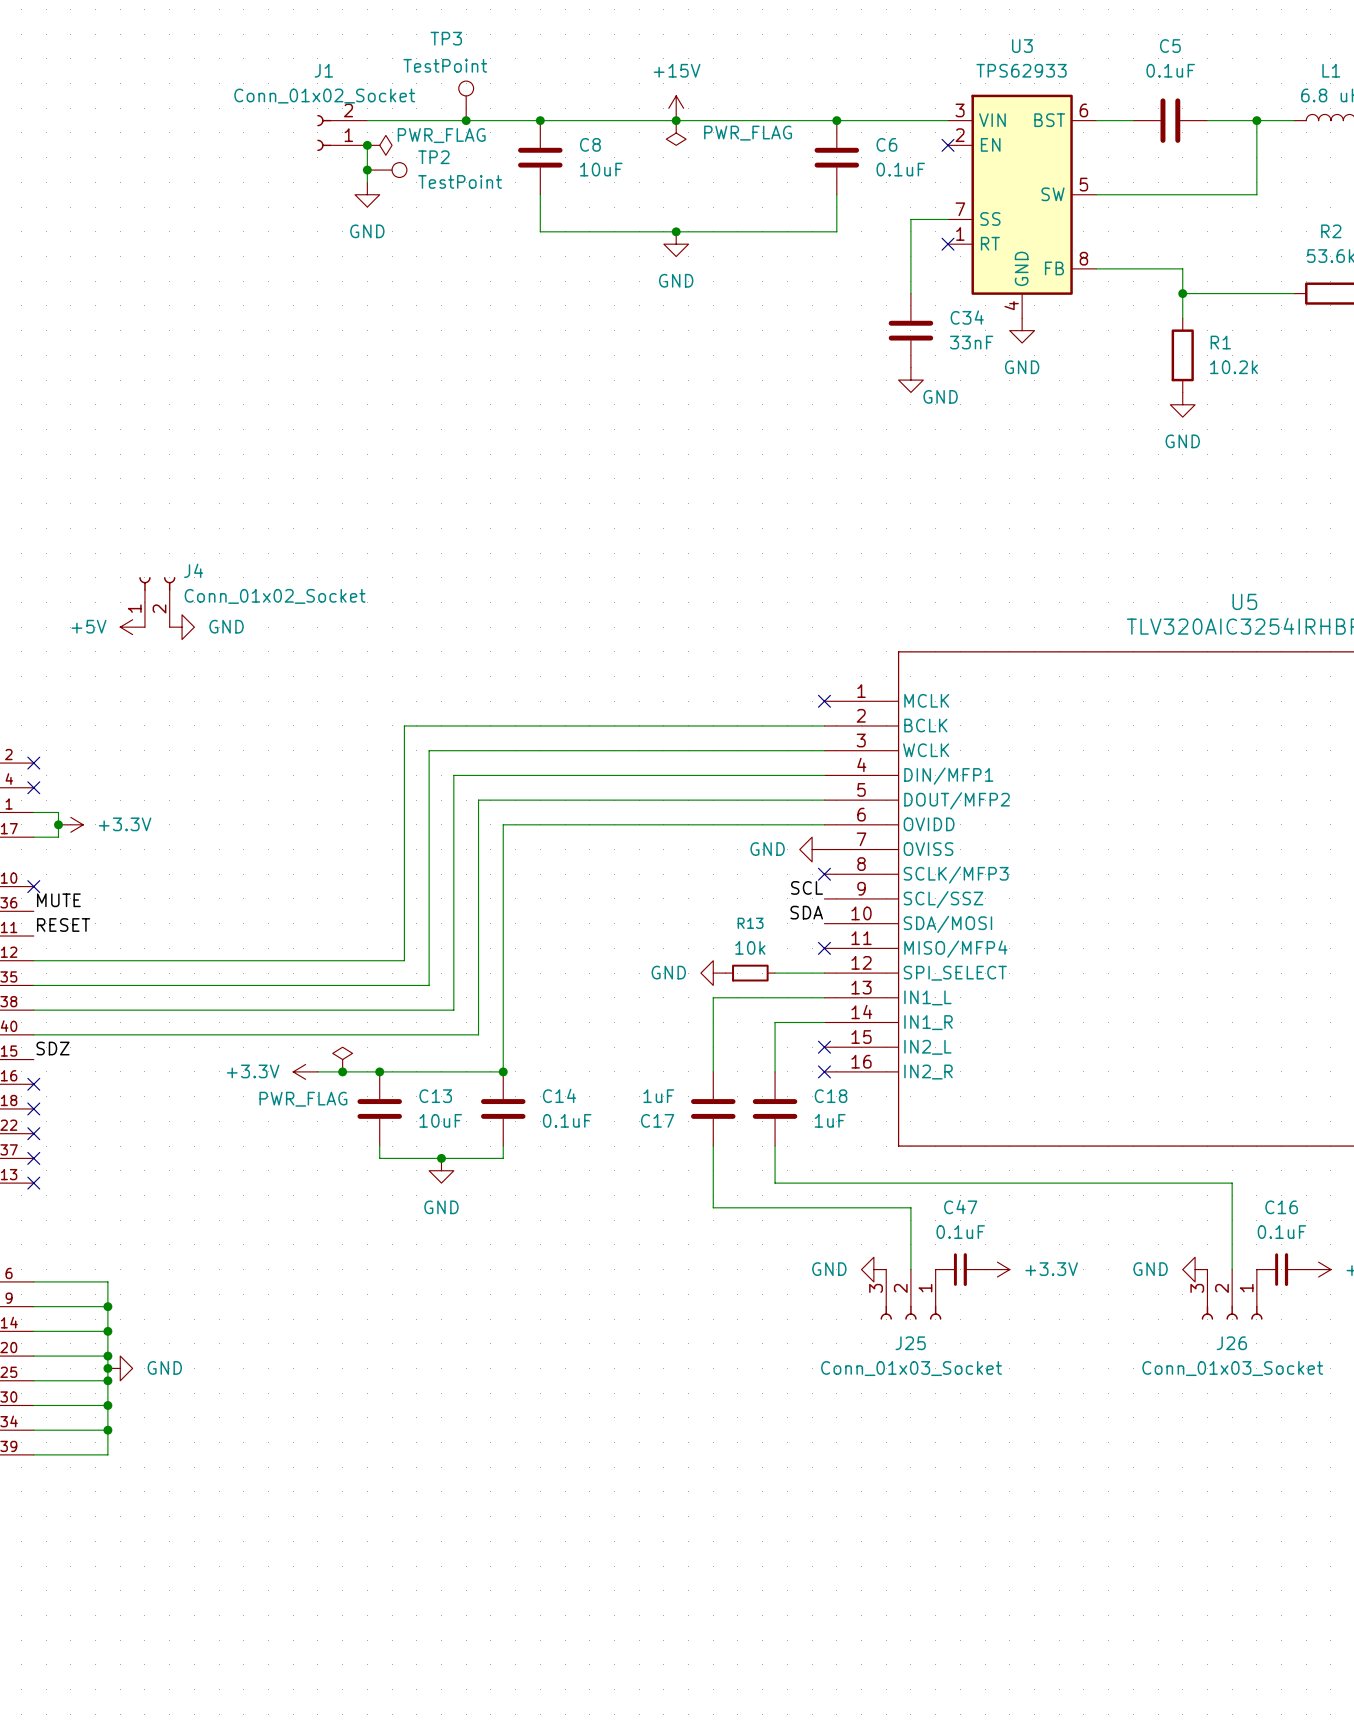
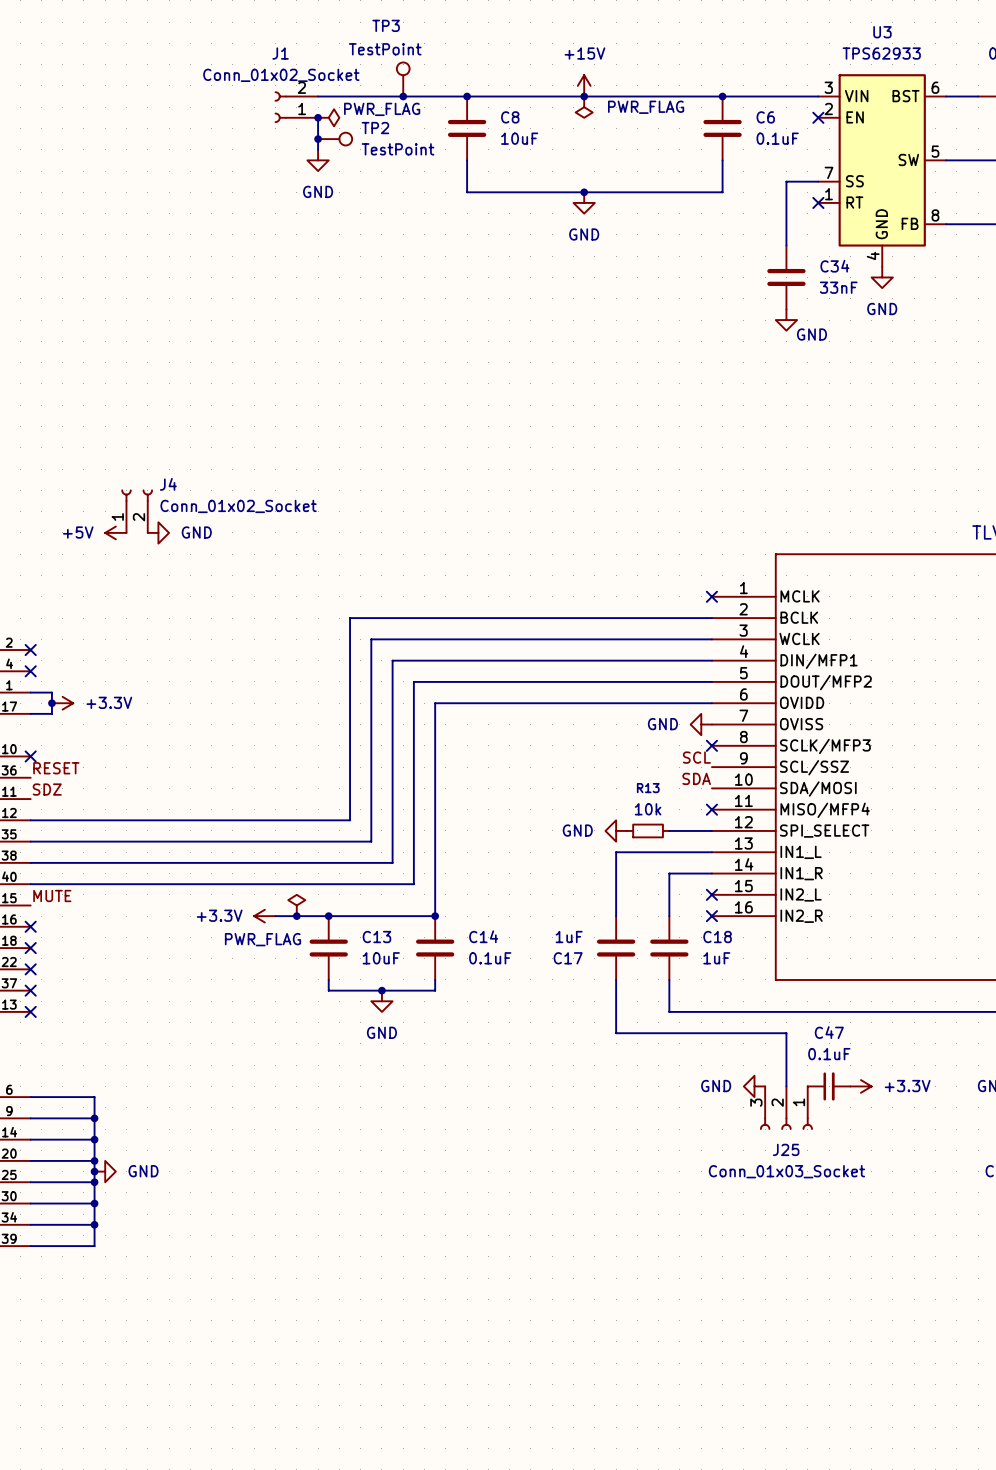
label: MUTE (58, 900) -> RESET (56, 768)
label: RESET (63, 924) -> SDZ (47, 789)
label: SDZ (53, 1048) -> MUTE (52, 895)

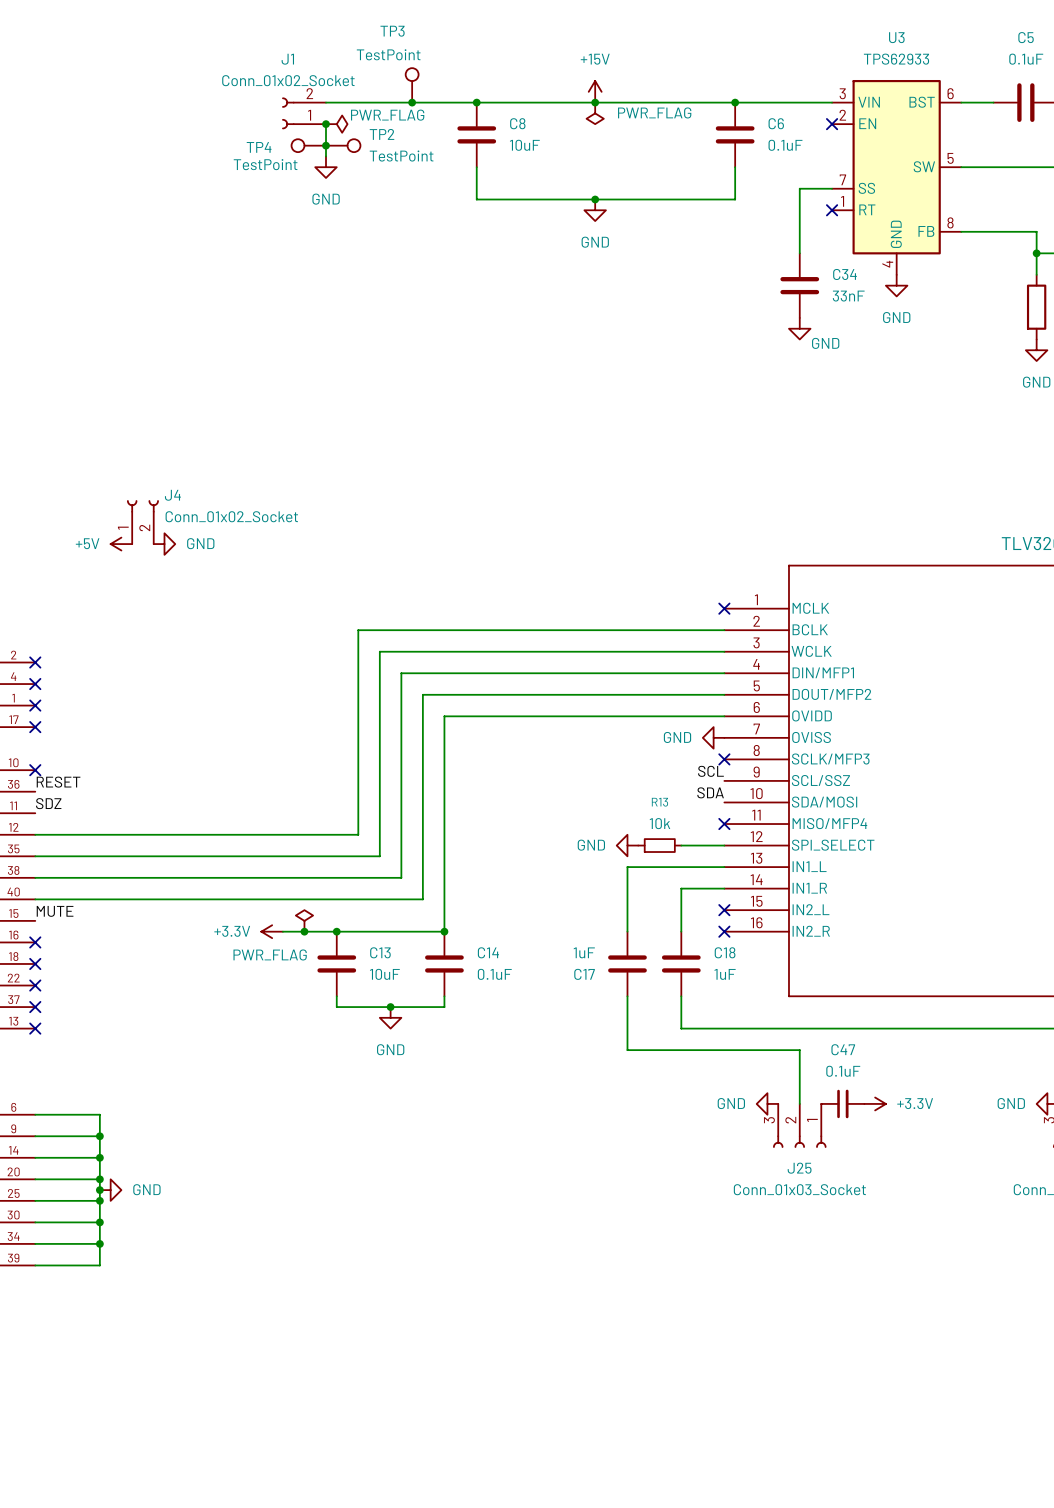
TP4: none -> TestPoint (308, 145)
wire: (30, 692) (51, 692) (51, 713) (30, 713) -> none
no-connect mark: none -> (35, 705)
junction: (51, 703) -> none
power symbol: +3.3V (62, 703) -> none
no-connect mark: none -> (35, 727)

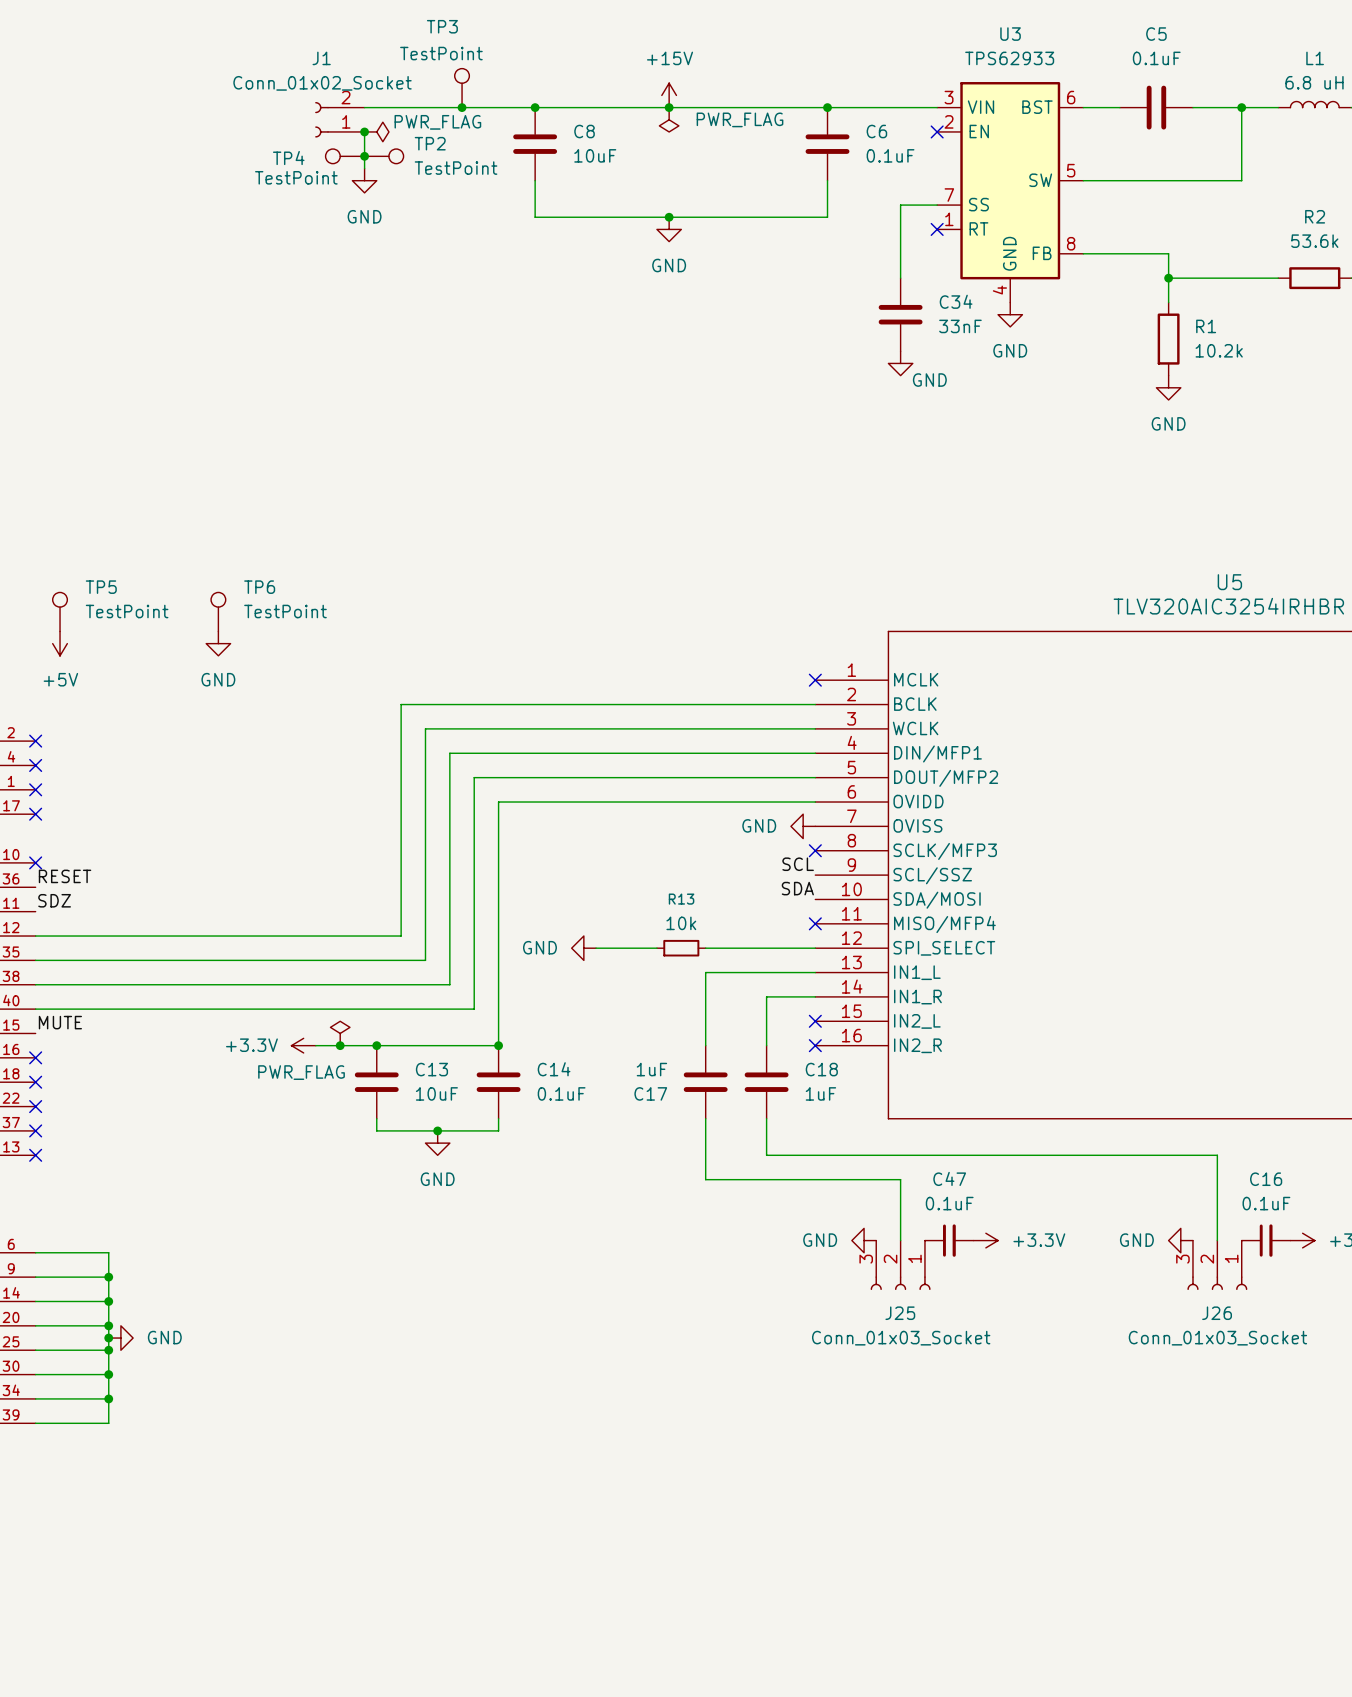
J4: Conn_01x02_Socket (142, 522) -> none
power symbol rotation: 0° (121, 544) -> 90° counterclockwise (60, 643)
power symbol position: +5V (121, 544) -> +5V (60, 643)
power symbol rotation: 0° (164, 544) -> 90° clockwise (218, 643)
power symbol position: GND (164, 544) -> GND (218, 643)
TP5: none -> TestPoint (60, 611)
TP6: none -> TestPoint (218, 611)
wire: none -> (596, 948) (656, 948)
wire: none -> (705, 948) (766, 948)
power symbol position: GND (627, 845) -> GND (583, 948)
R13 position: (659, 845) -> (681, 948)

